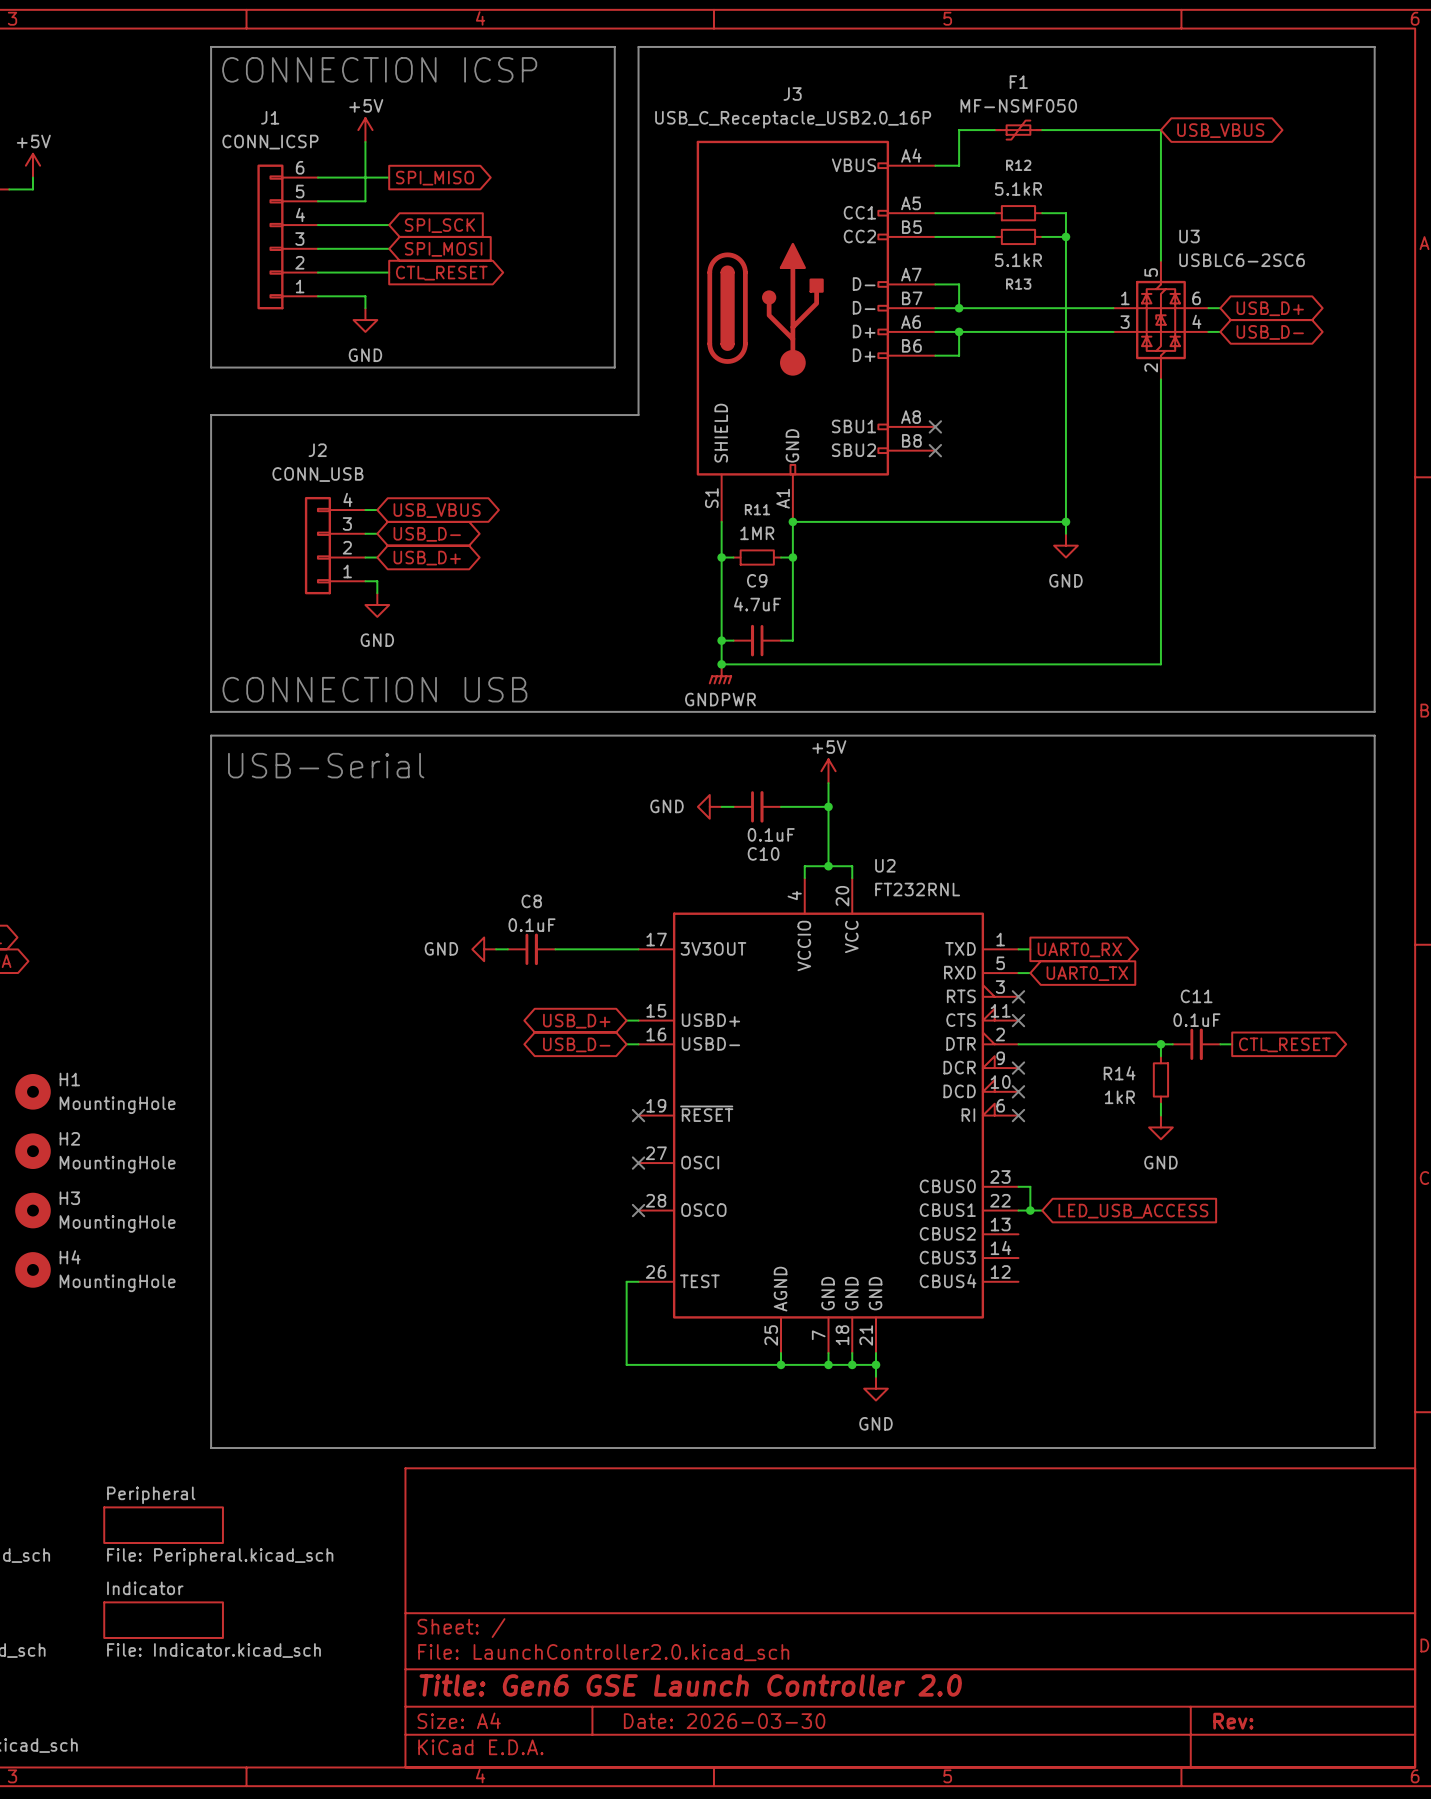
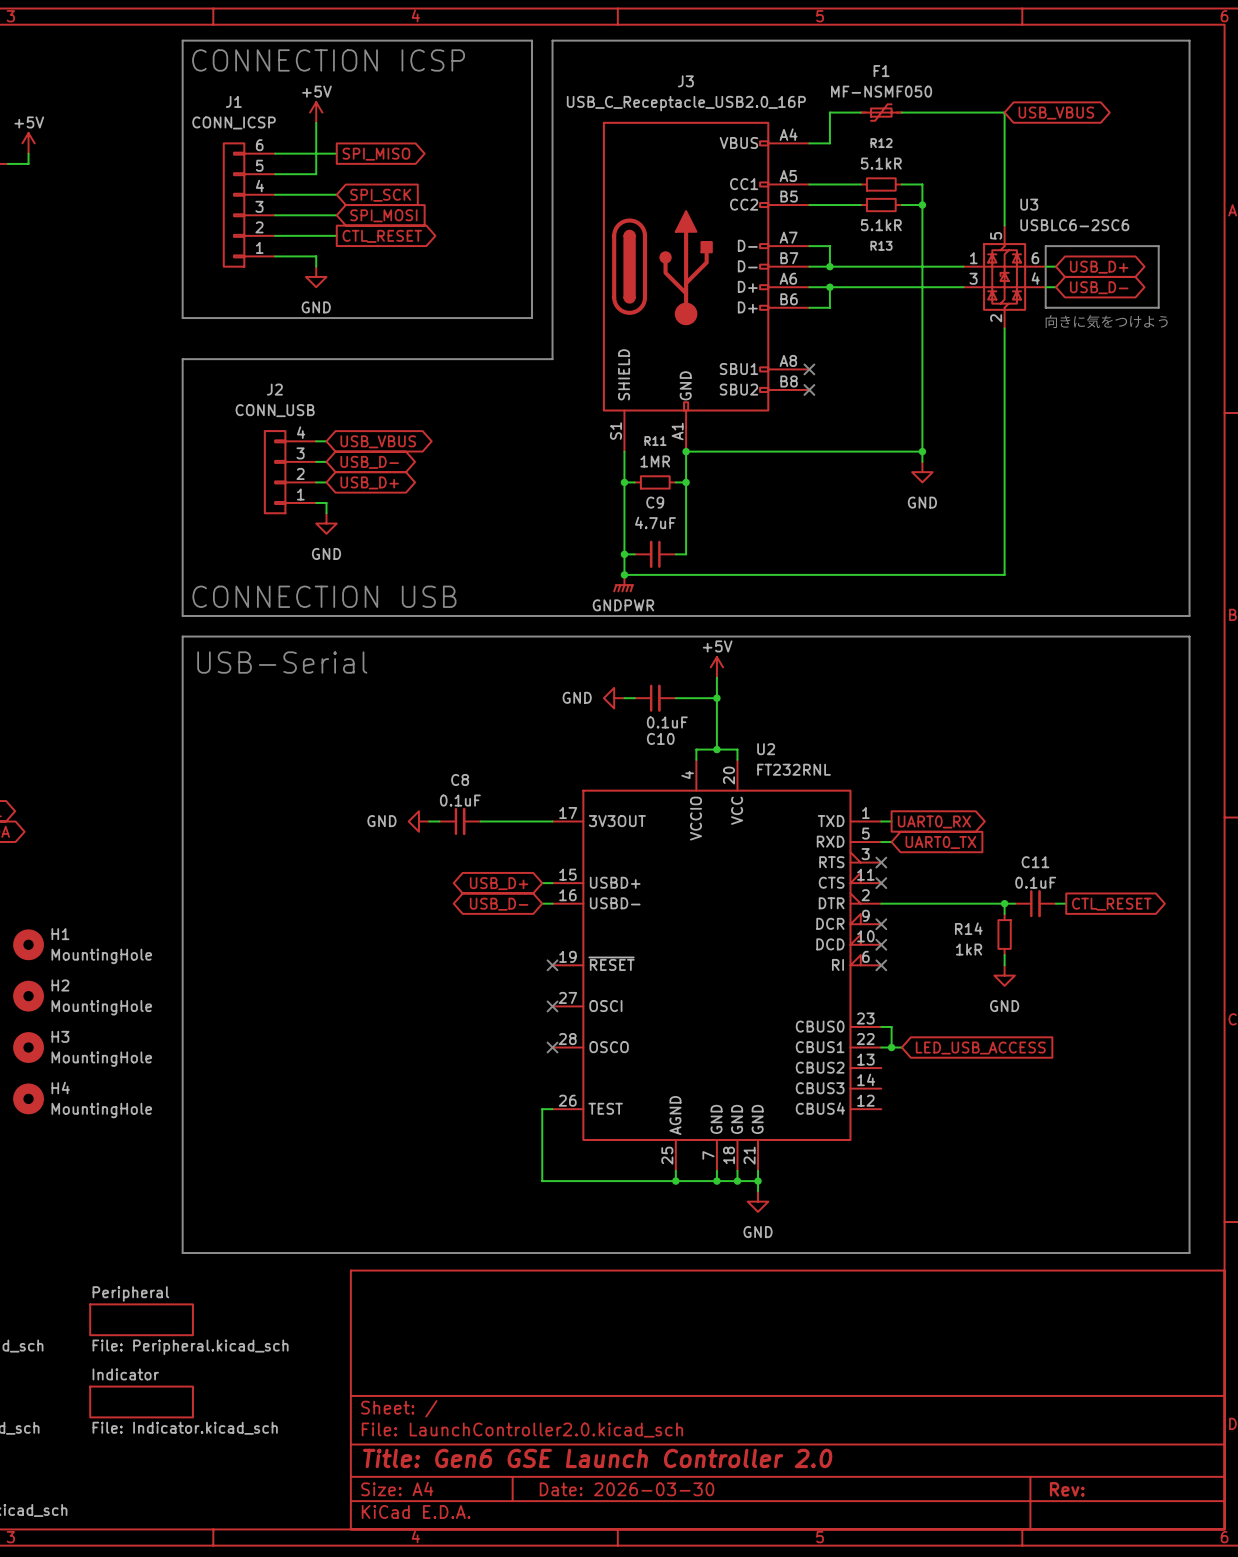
line: none -> (1045, 246) (1158, 246) (1158, 307) (1045, 307) (1045, 246)
text: none -> 向きに気をつけよう (1106, 321)

